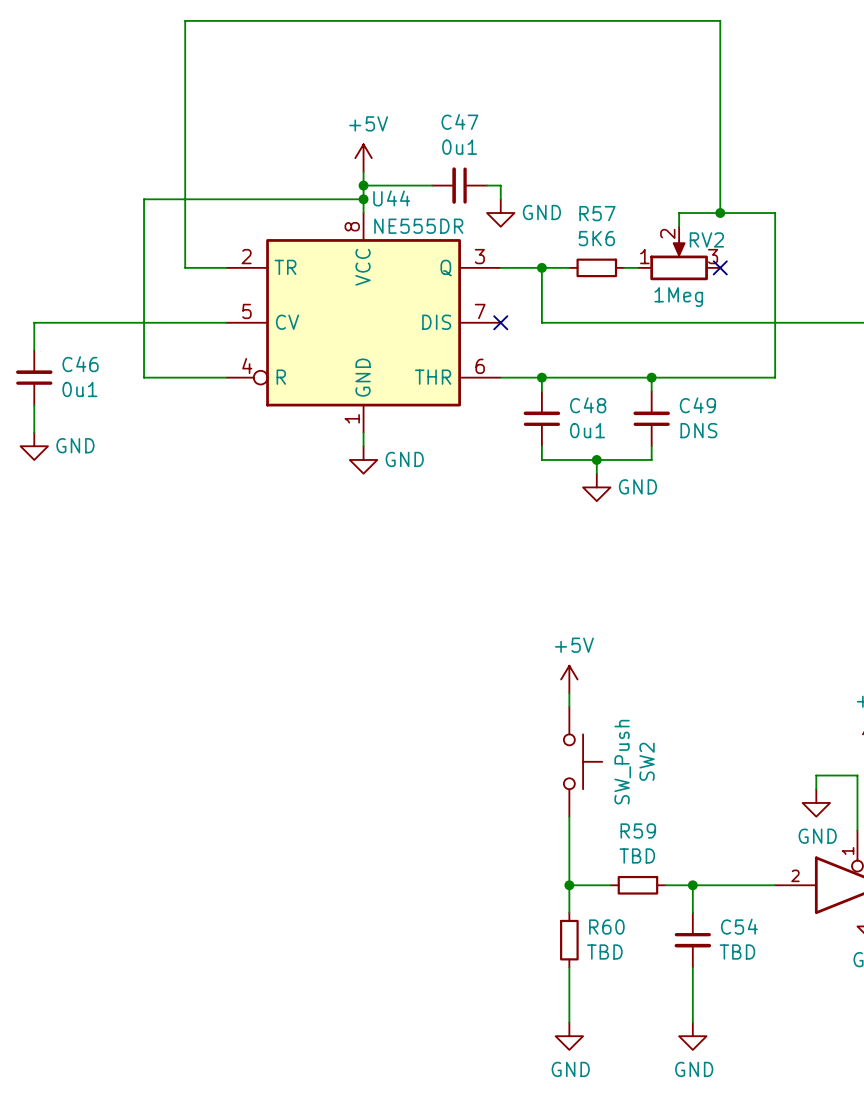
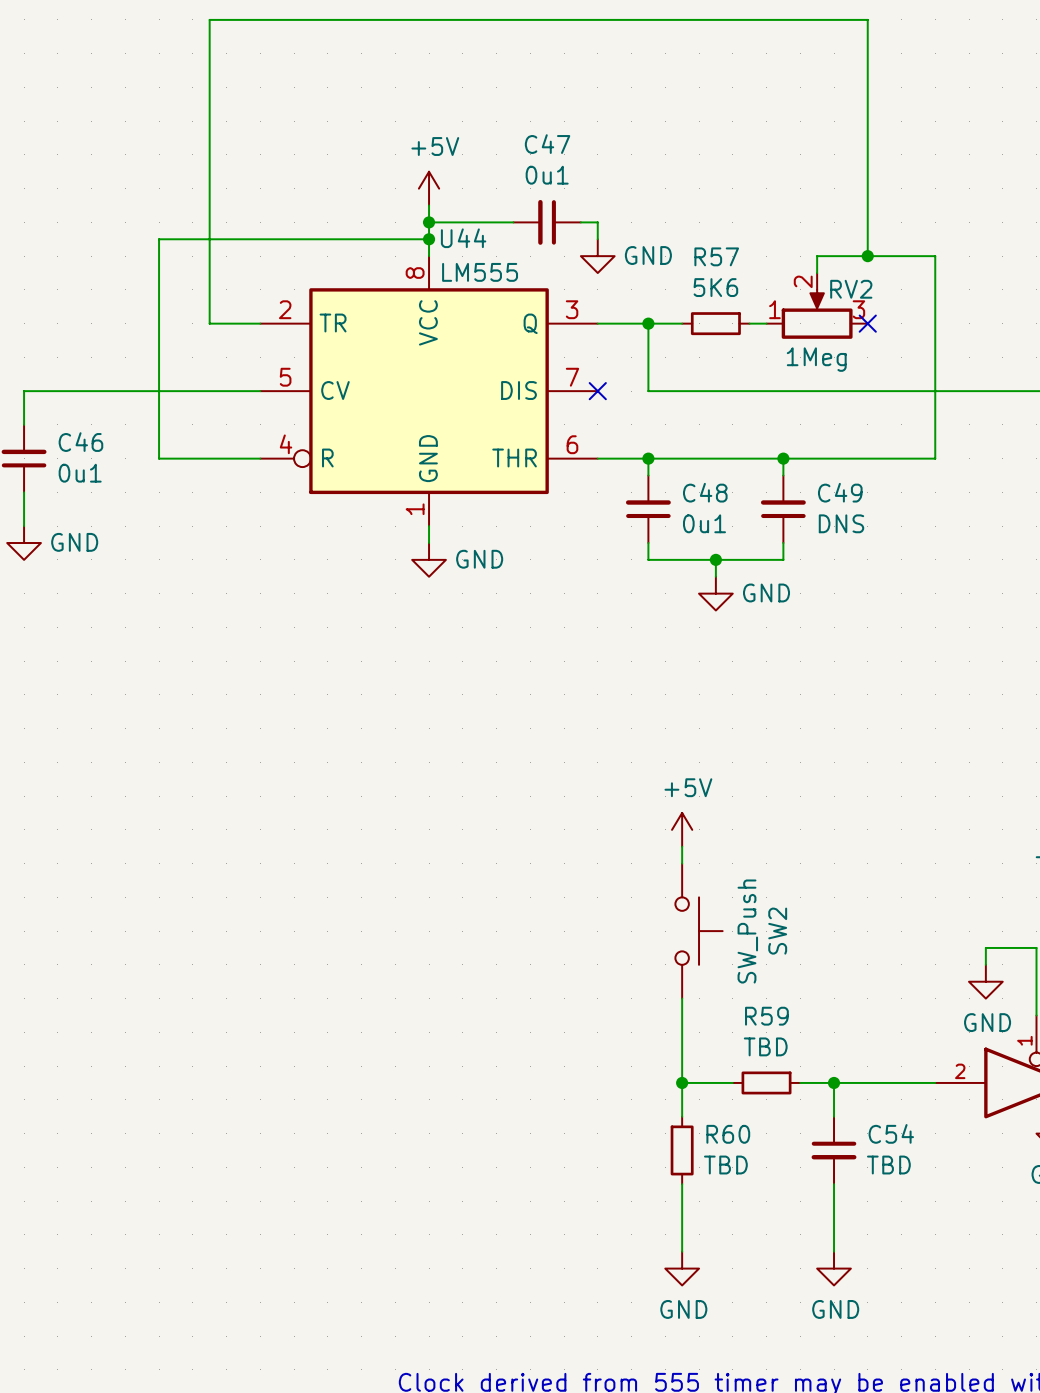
U44 value: NE555DR (418, 226) -> LM555 (480, 272)

